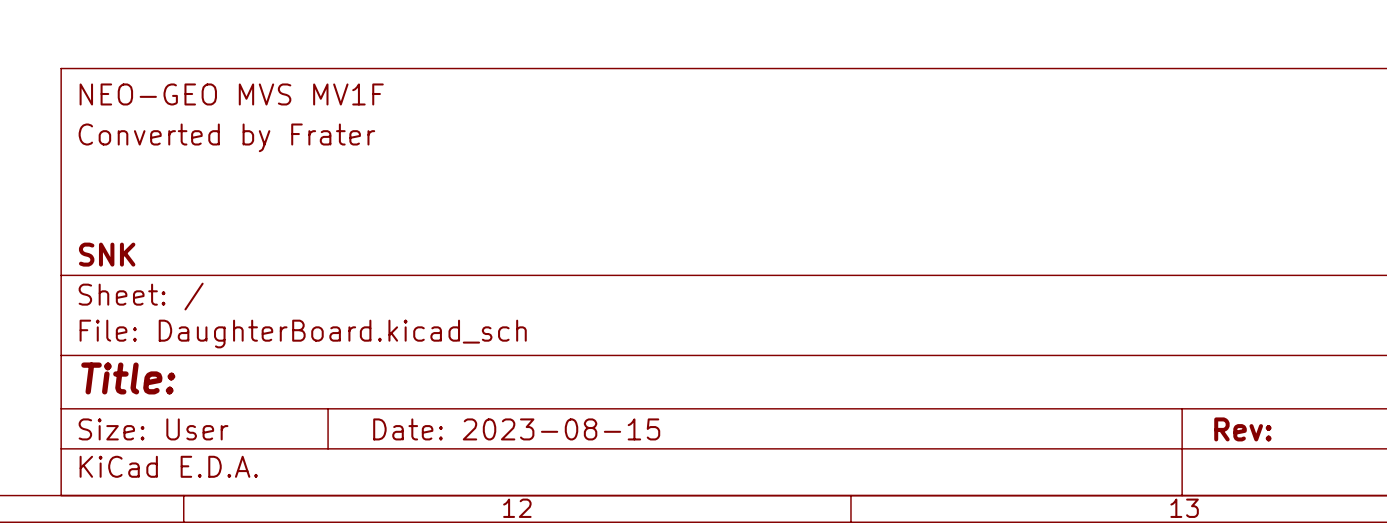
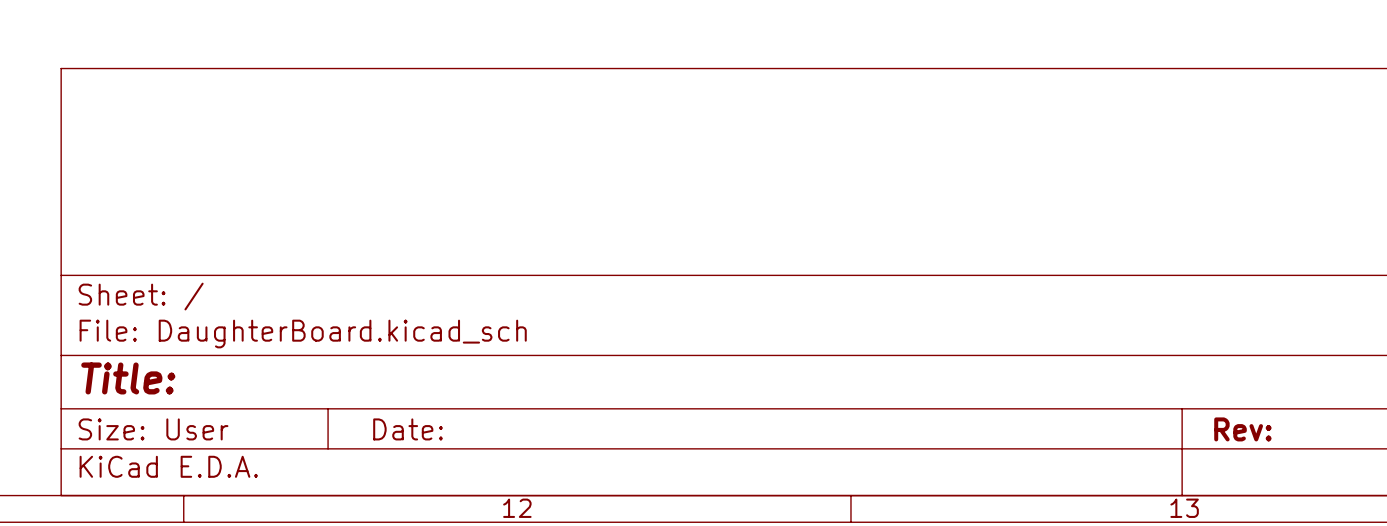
title block: NEO-GEO MVS MV1F (231, 94) -> none
title block: Converted by Frater (226, 137) -> none
title block: SNK (107, 254) -> none
title block: Date: 2023-08-15 (516, 429) -> Date: (408, 429)

